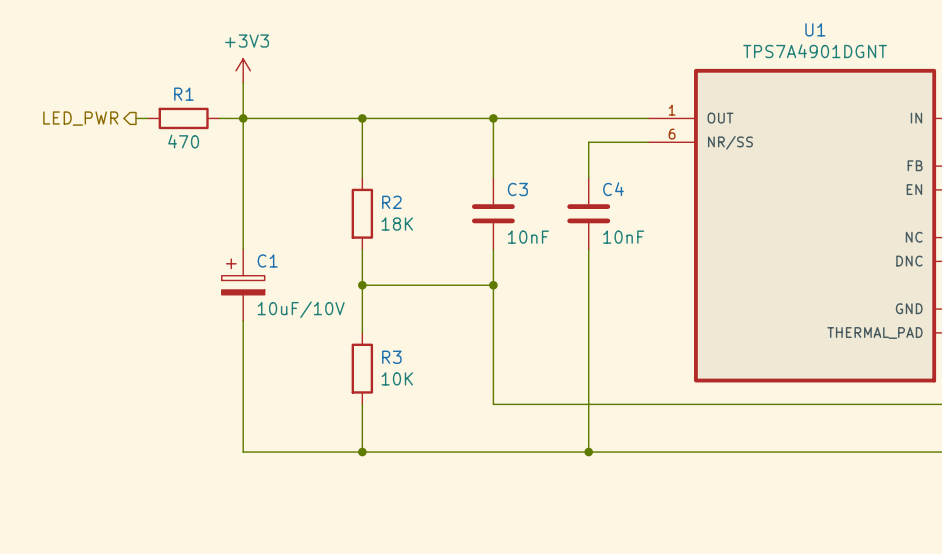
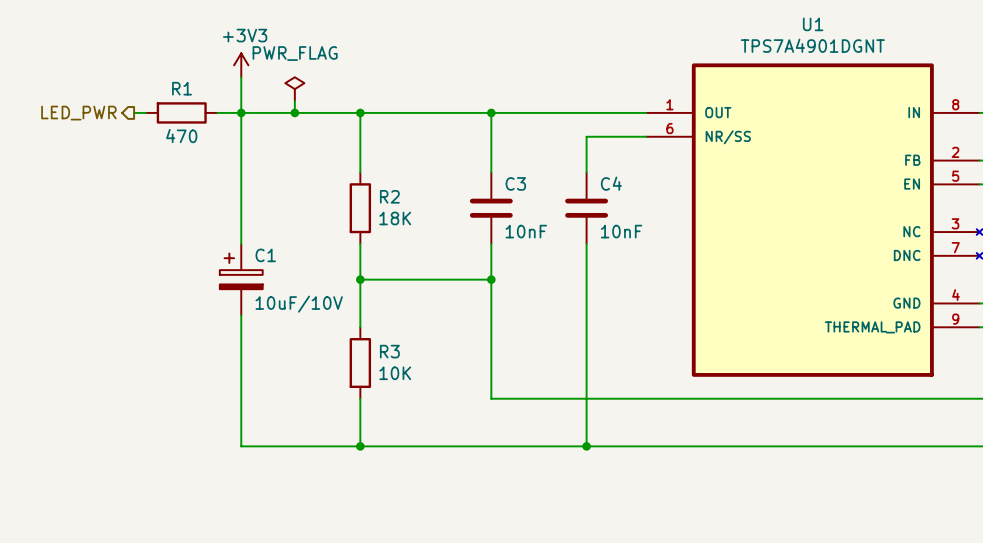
power symbol: none -> PWR_FLAG (294, 89)
wire: none -> (294, 101) (294, 112)
junction: none -> (294, 112)

